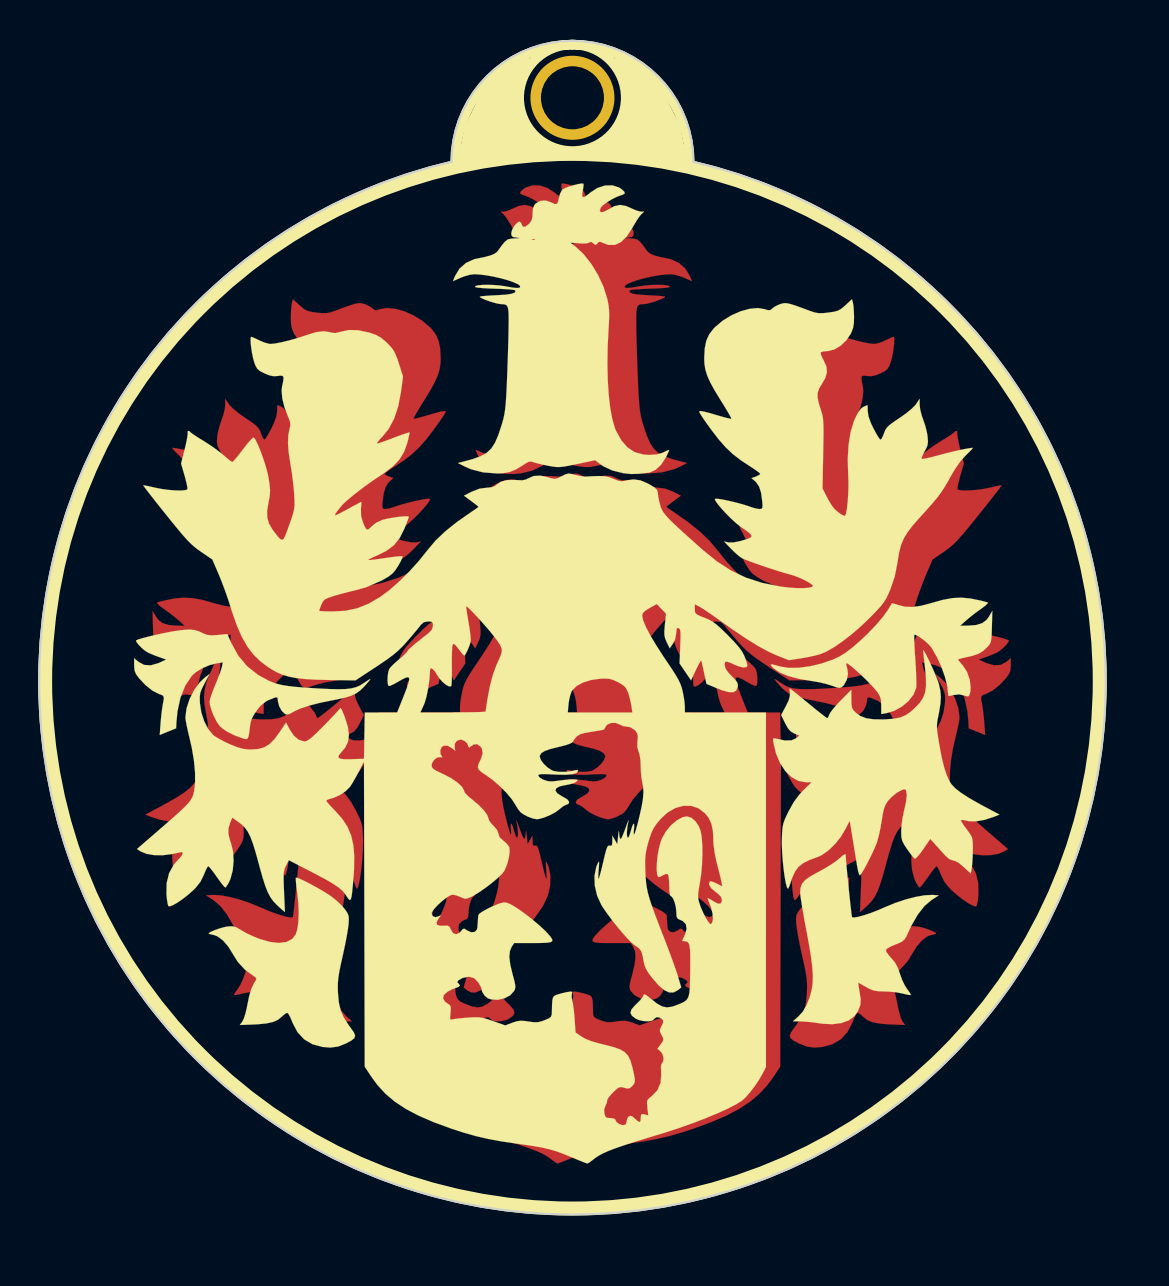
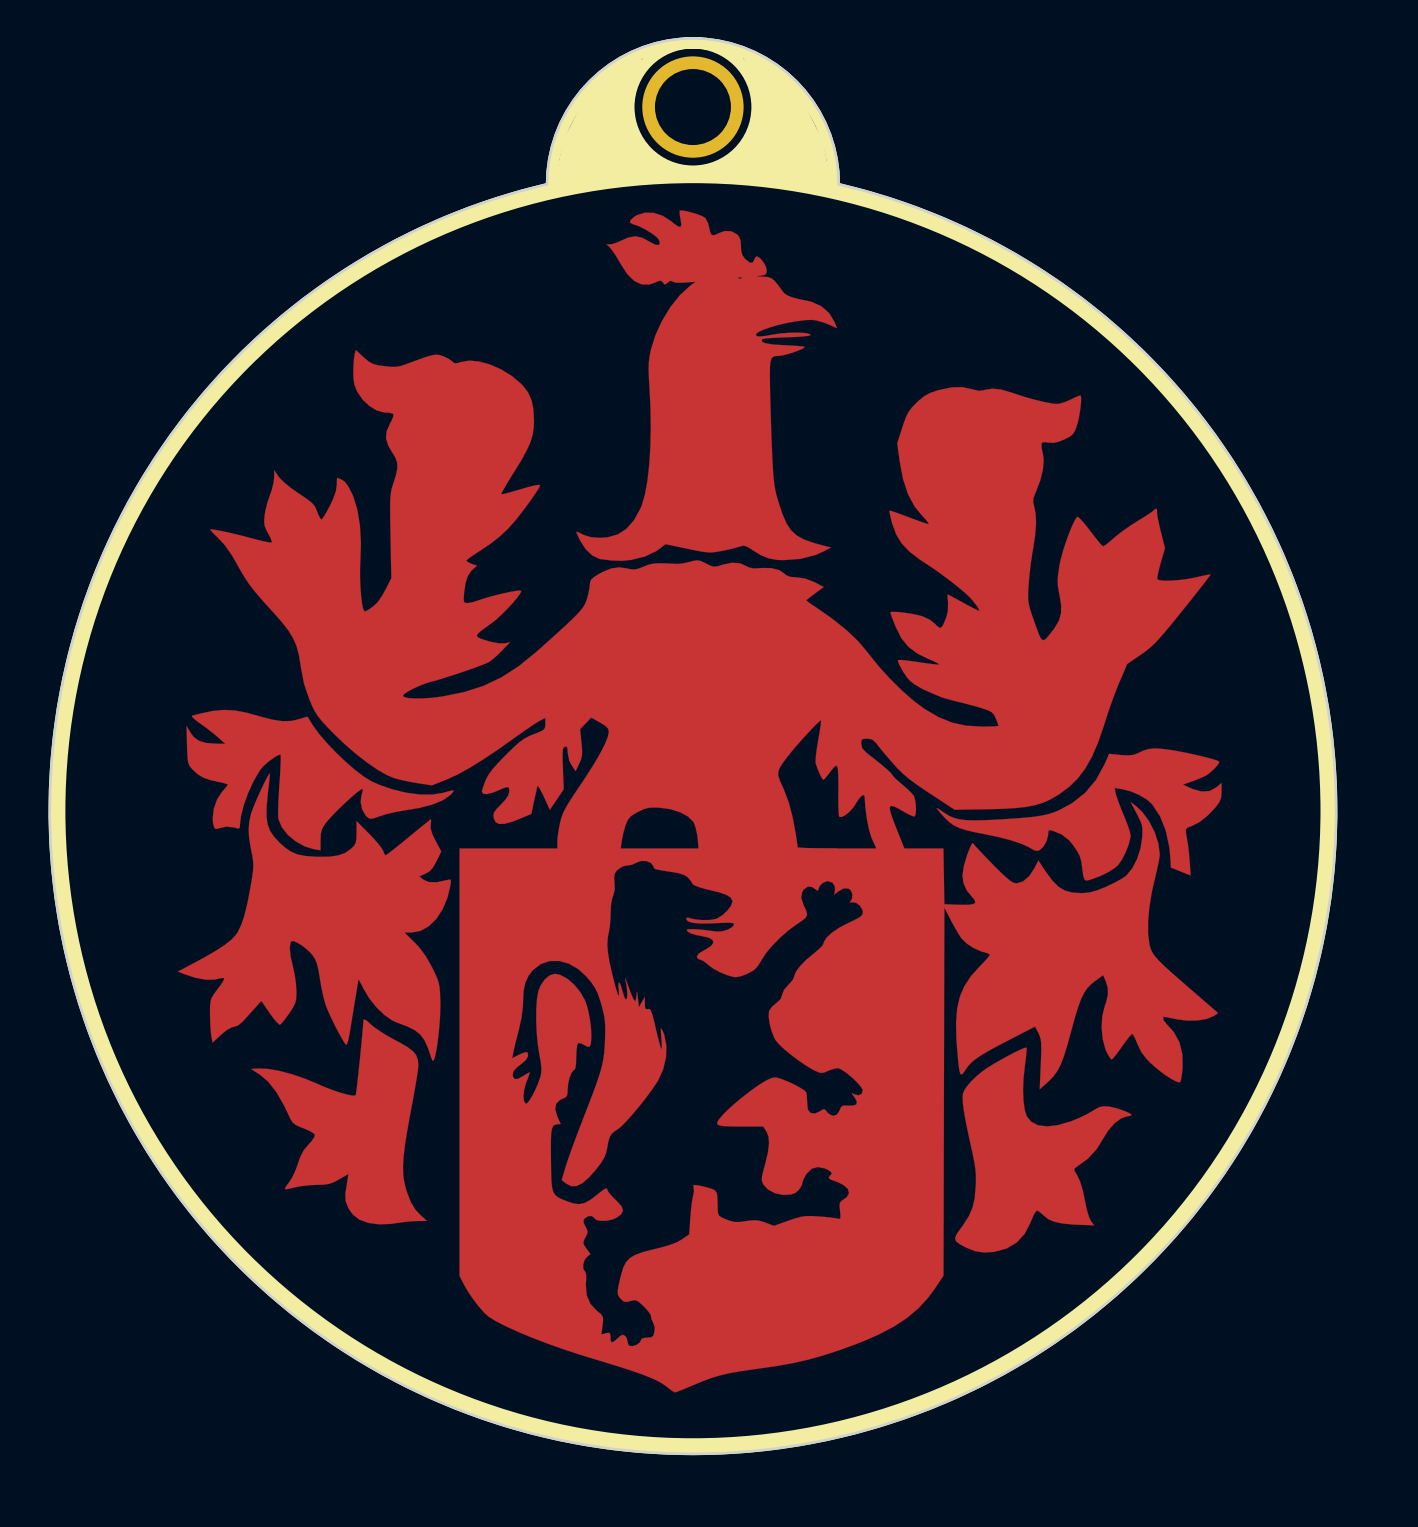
drawing: [134, 183, 1000, 1164] -> none

